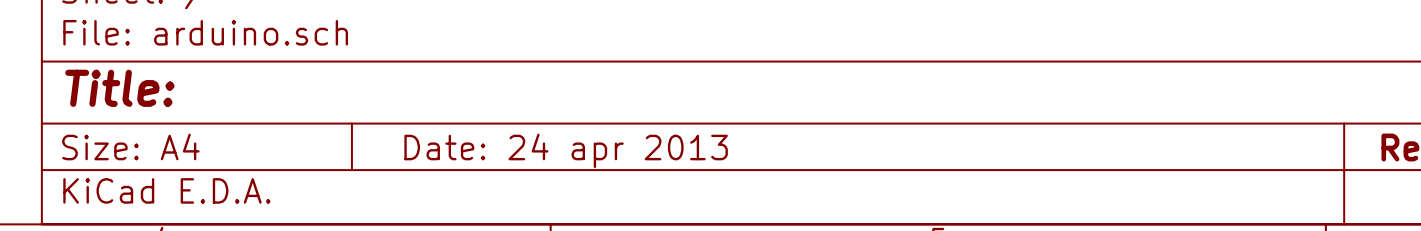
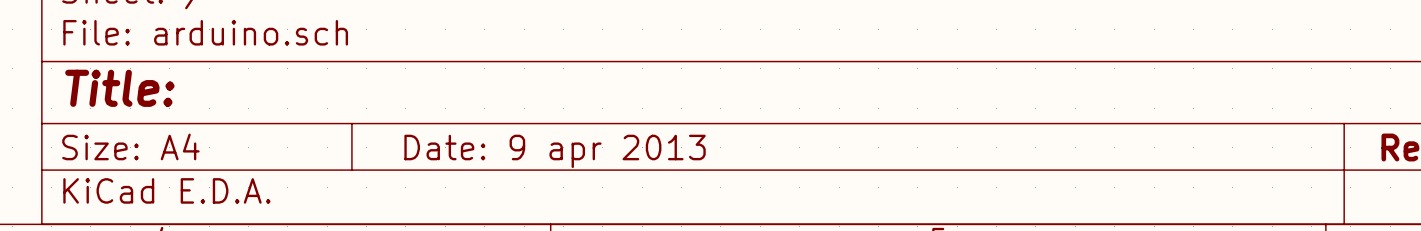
title block: Date: 24 apr 2013 (566, 150) -> Date: 9 apr 2013 (555, 151)

